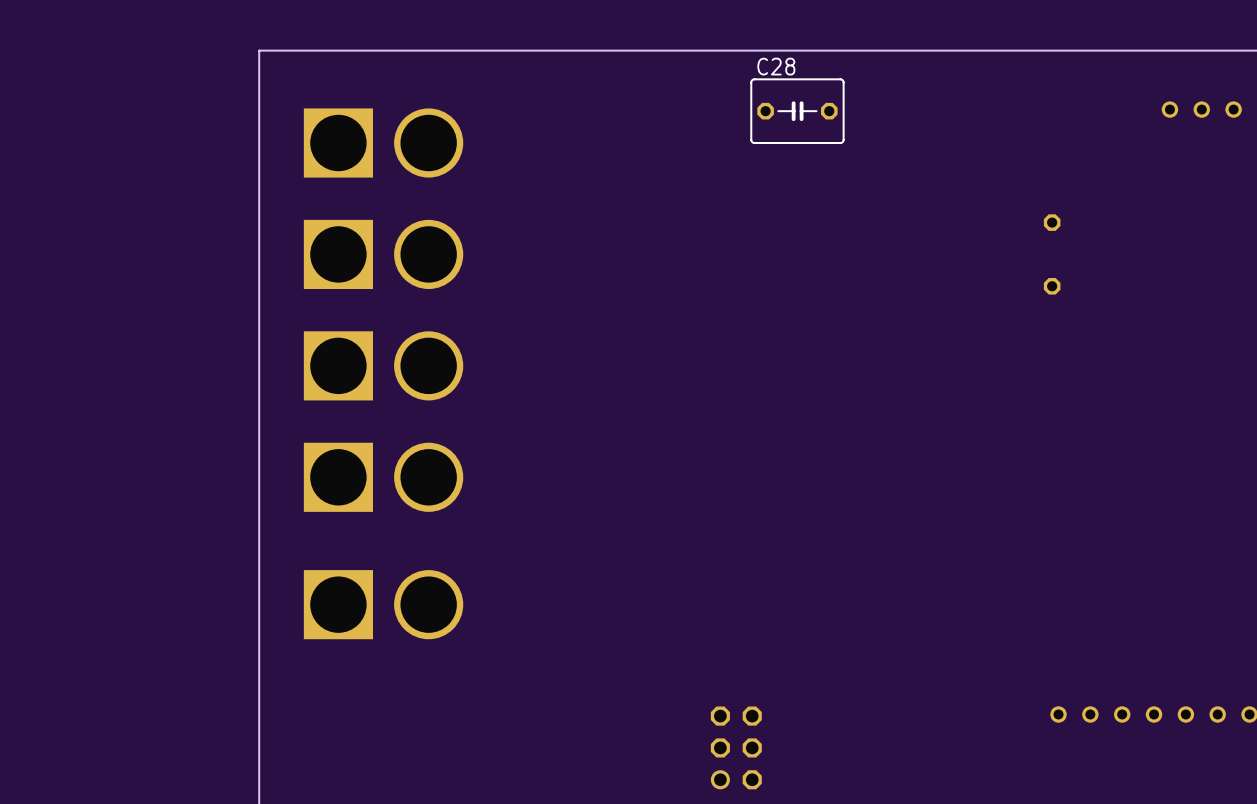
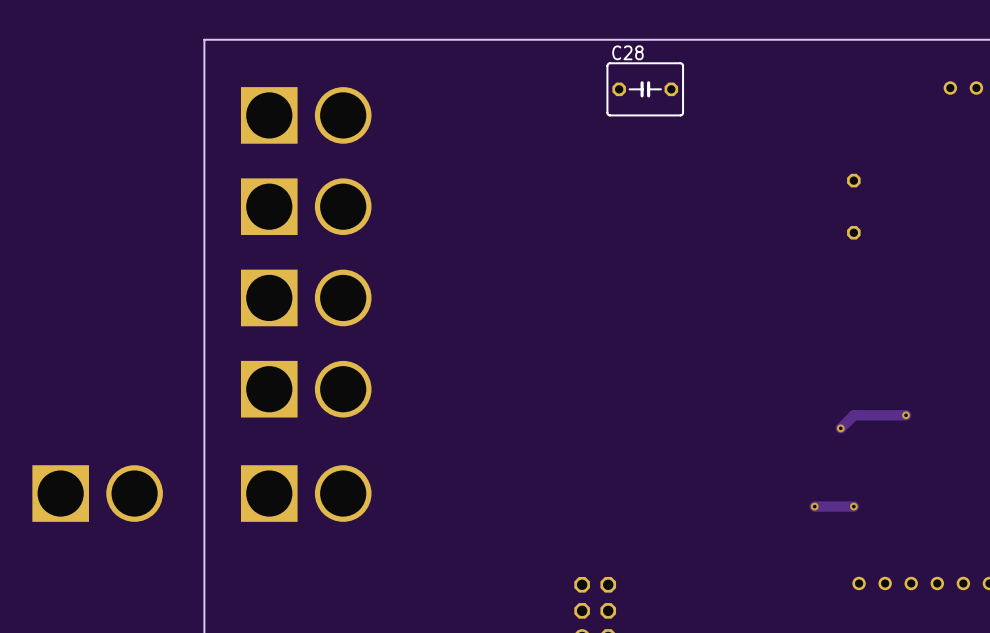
track: none -> (906, 415) (853, 415) (840, 428)
via: none -> (906, 415)
via: none -> (840, 428)
part: none -> (97, 493)
via: none -> (814, 506)
track: none -> (853, 506) (814, 506)
via: none -> (853, 506)

